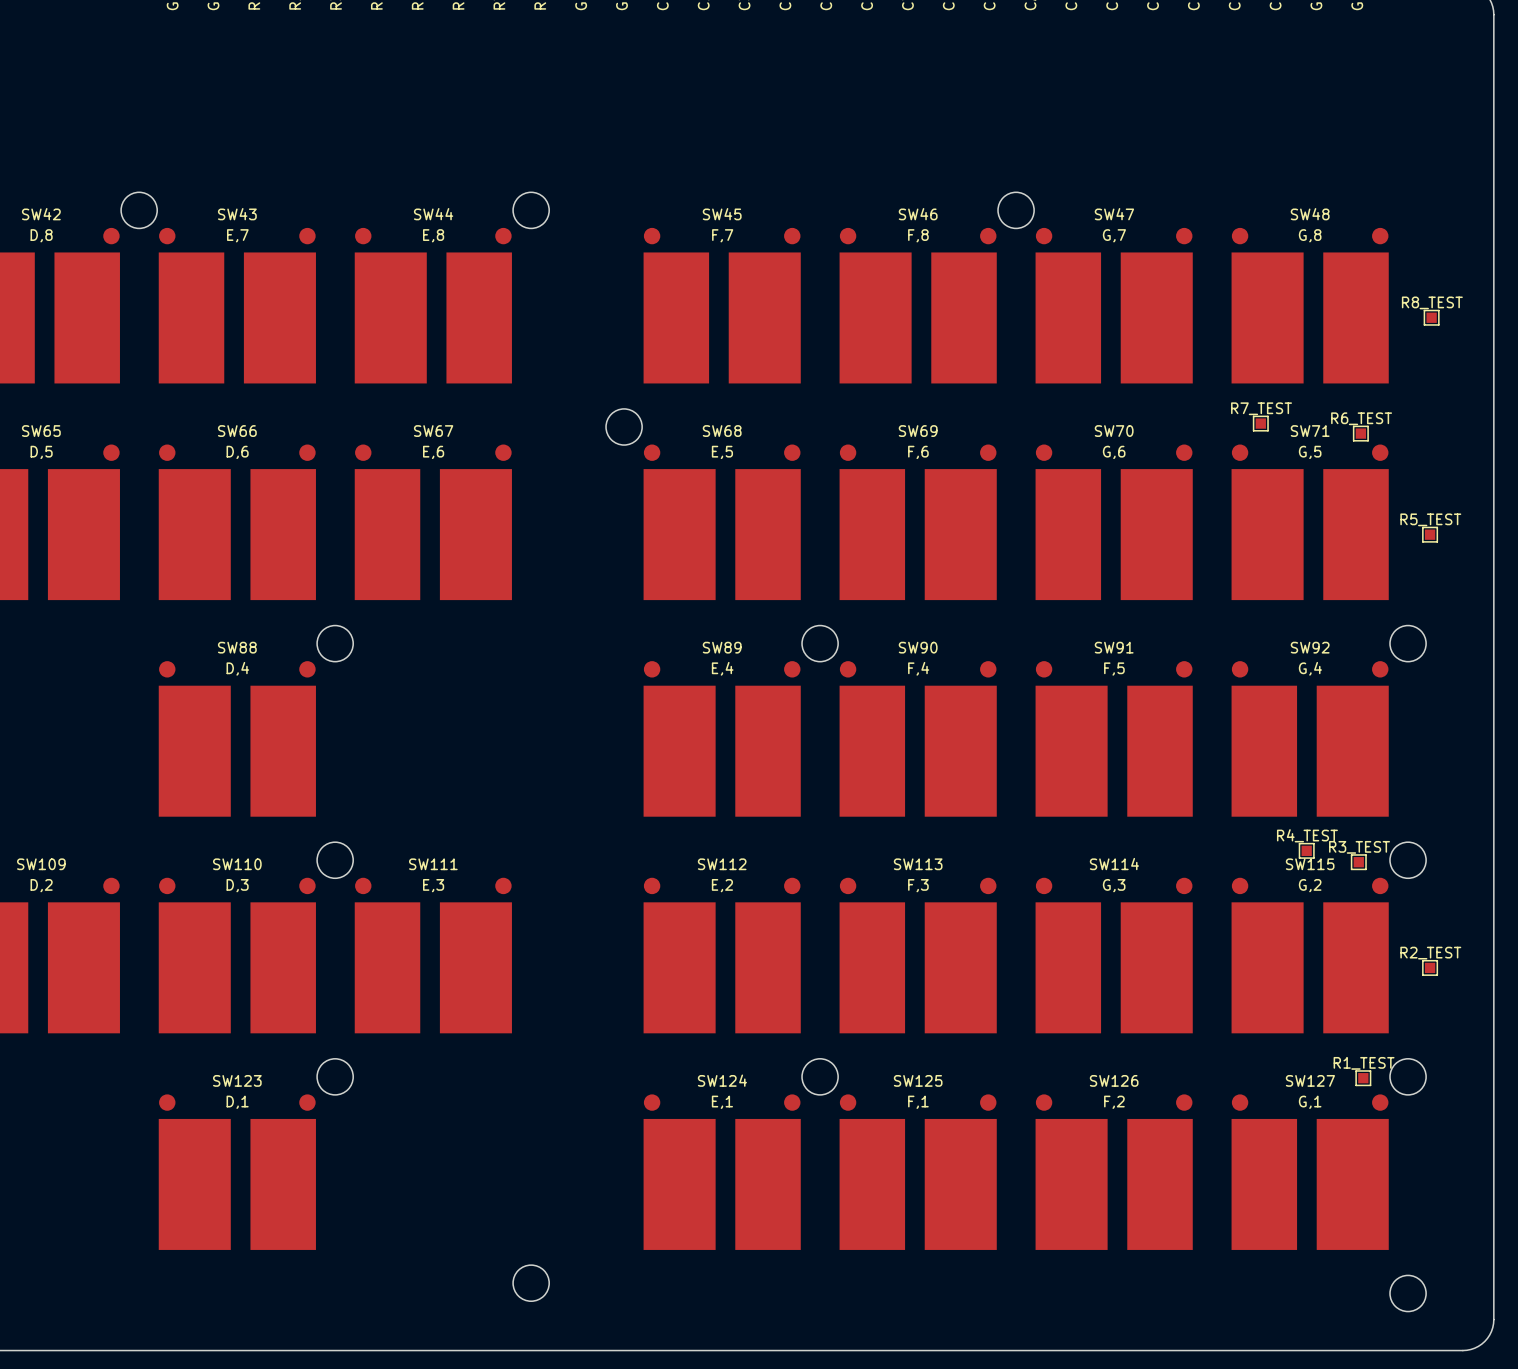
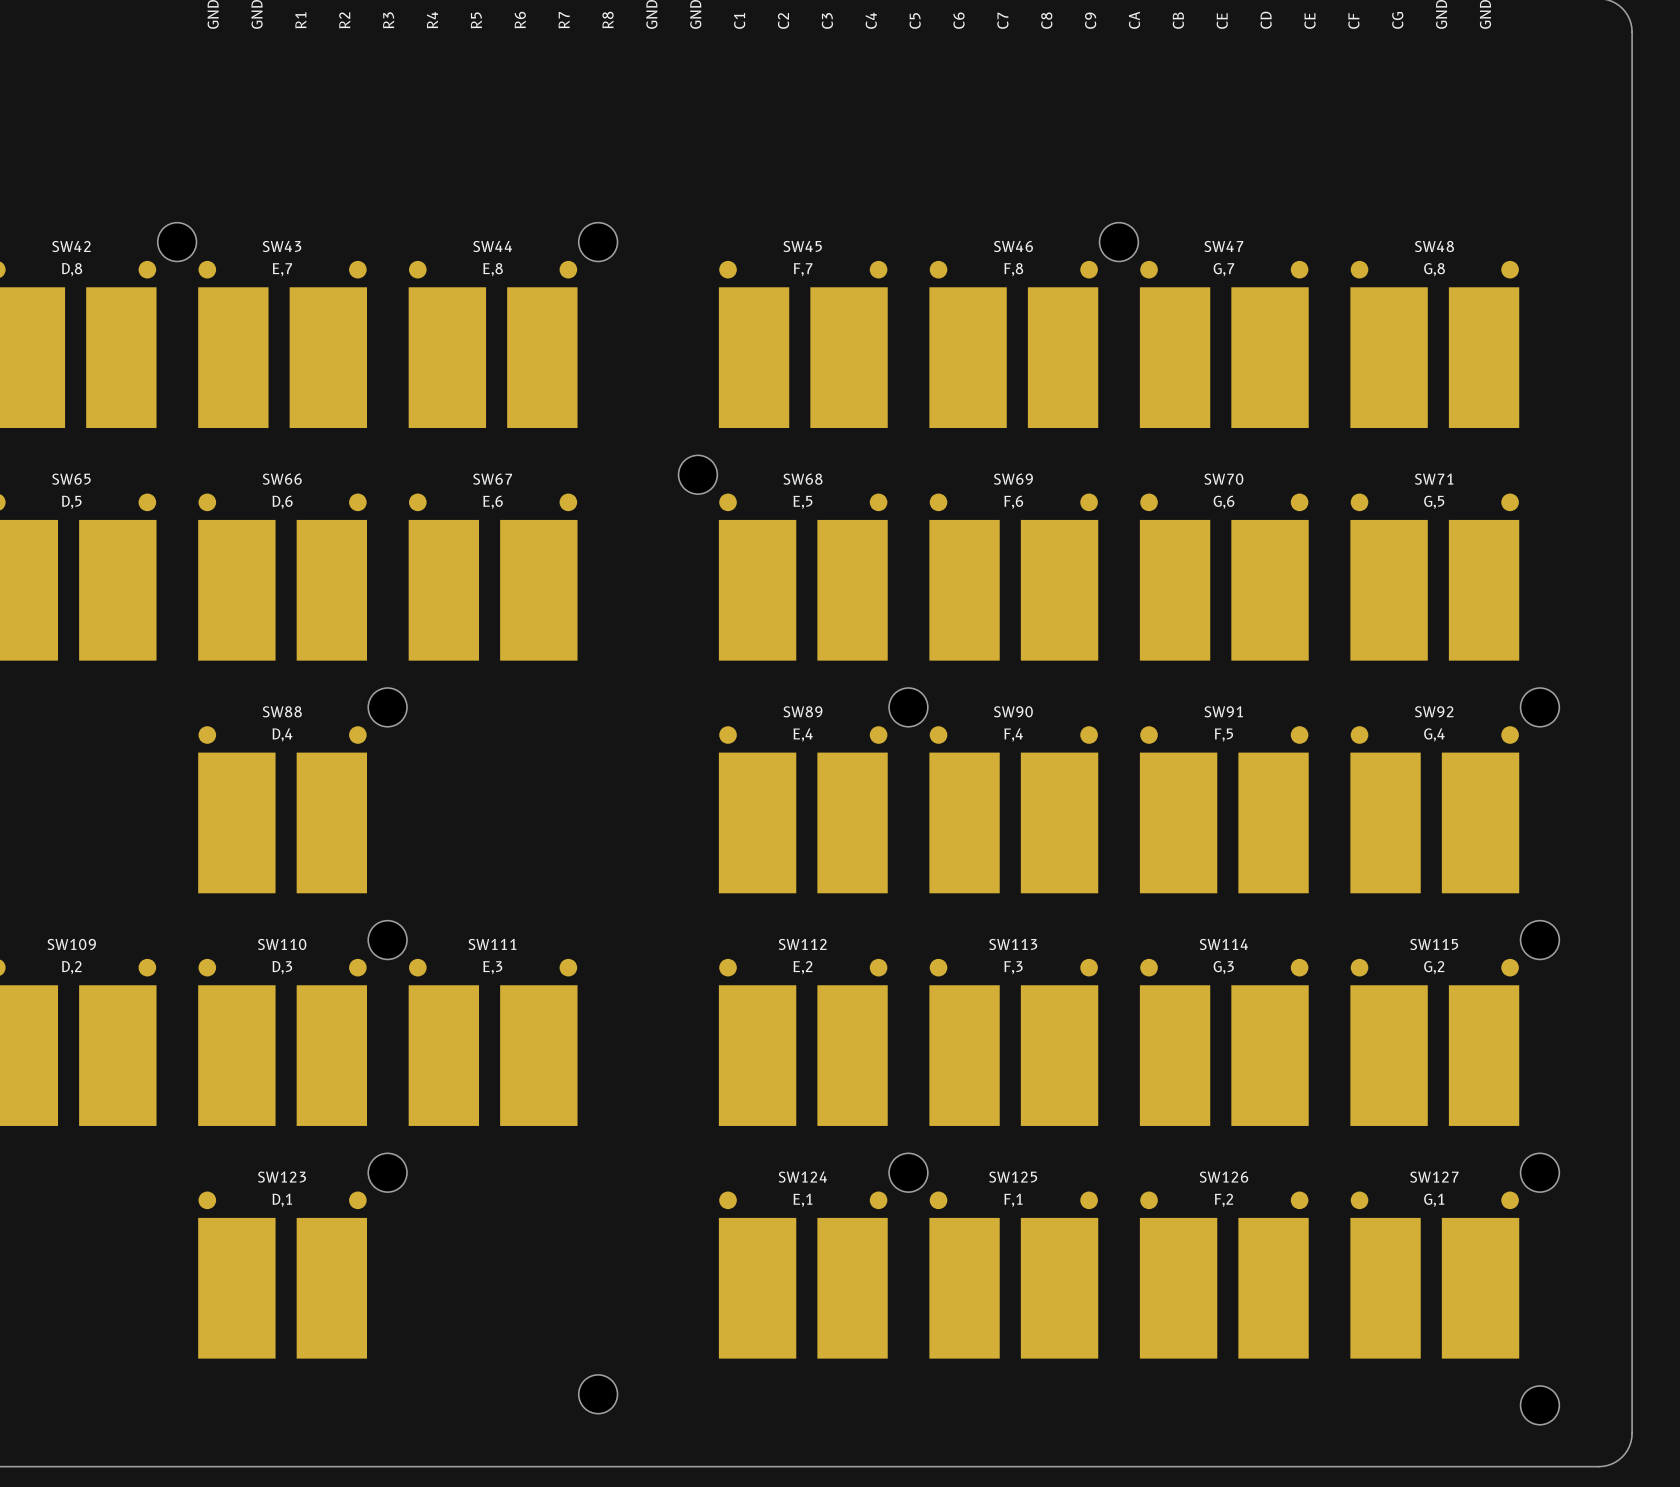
R8_TEST: (1431, 317) -> none
R7_TEST: (1260, 423) -> none
R6_TEST: (1360, 433) -> none
R5_TEST: (1430, 534) -> none
R4_TEST: (1306, 850) -> none
R3_TEST: (1358, 862) -> none
R2_TEST: (1430, 967) -> none
R1_TEST: (1363, 1078) -> none

